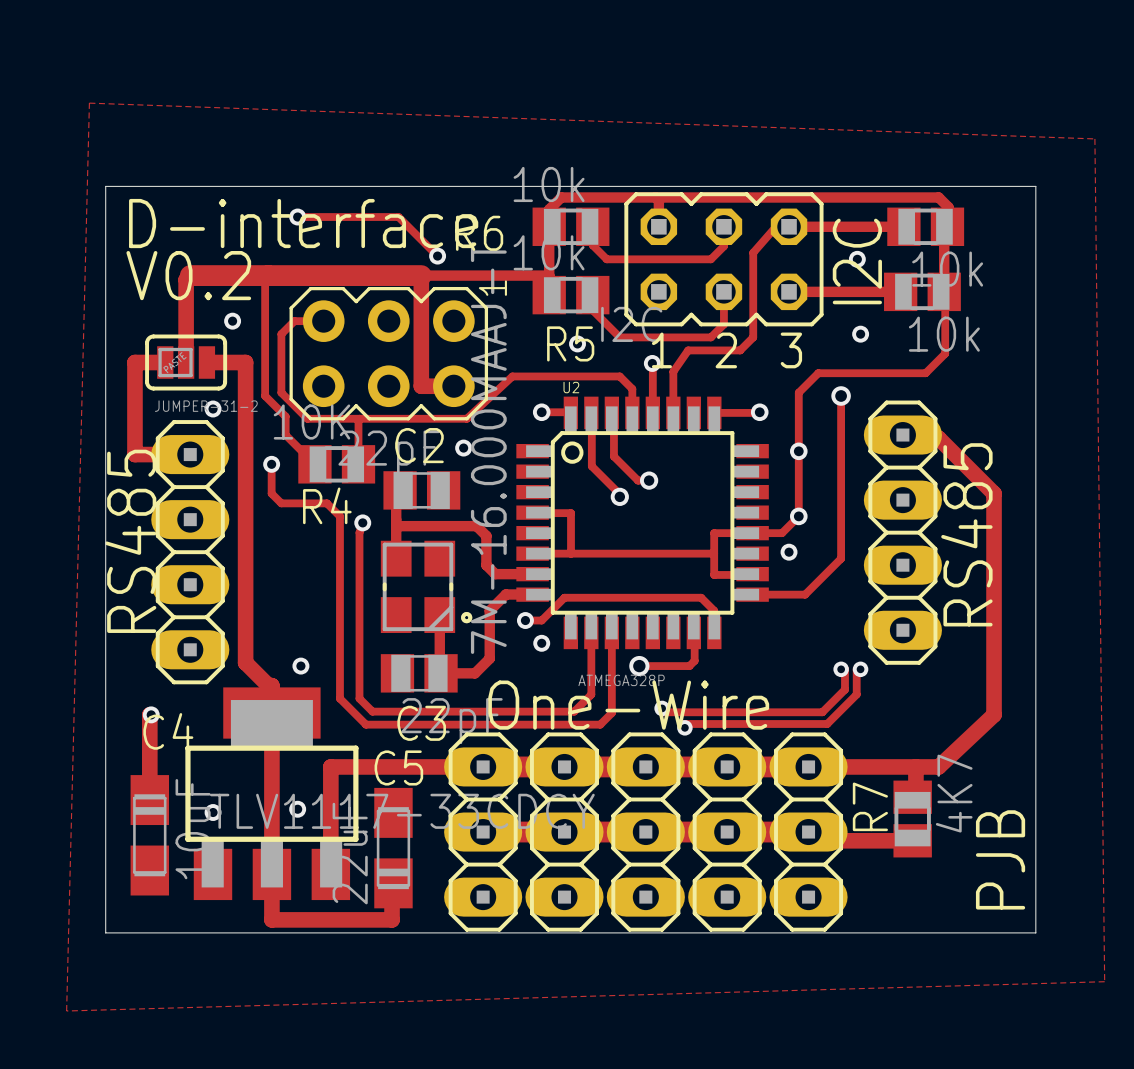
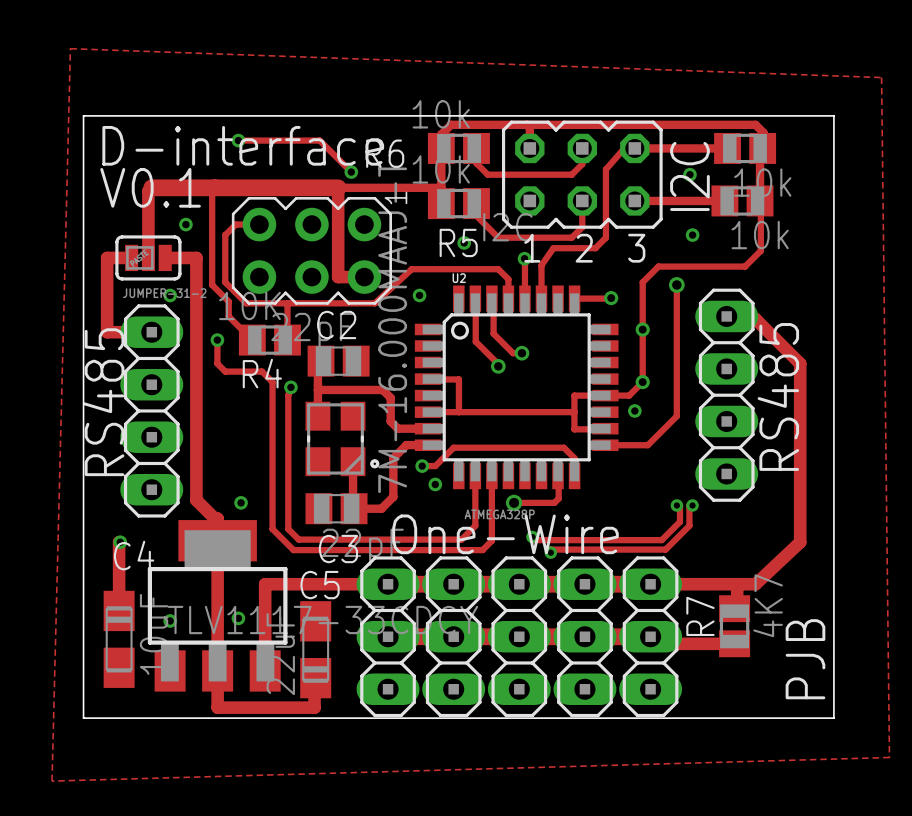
text: V0.2 (188, 275) -> V0.1 (150, 187)
track: (541, 412) (570, 412) -> none
via: (541, 412) -> none
via position: (463, 448) -> (419, 295)

